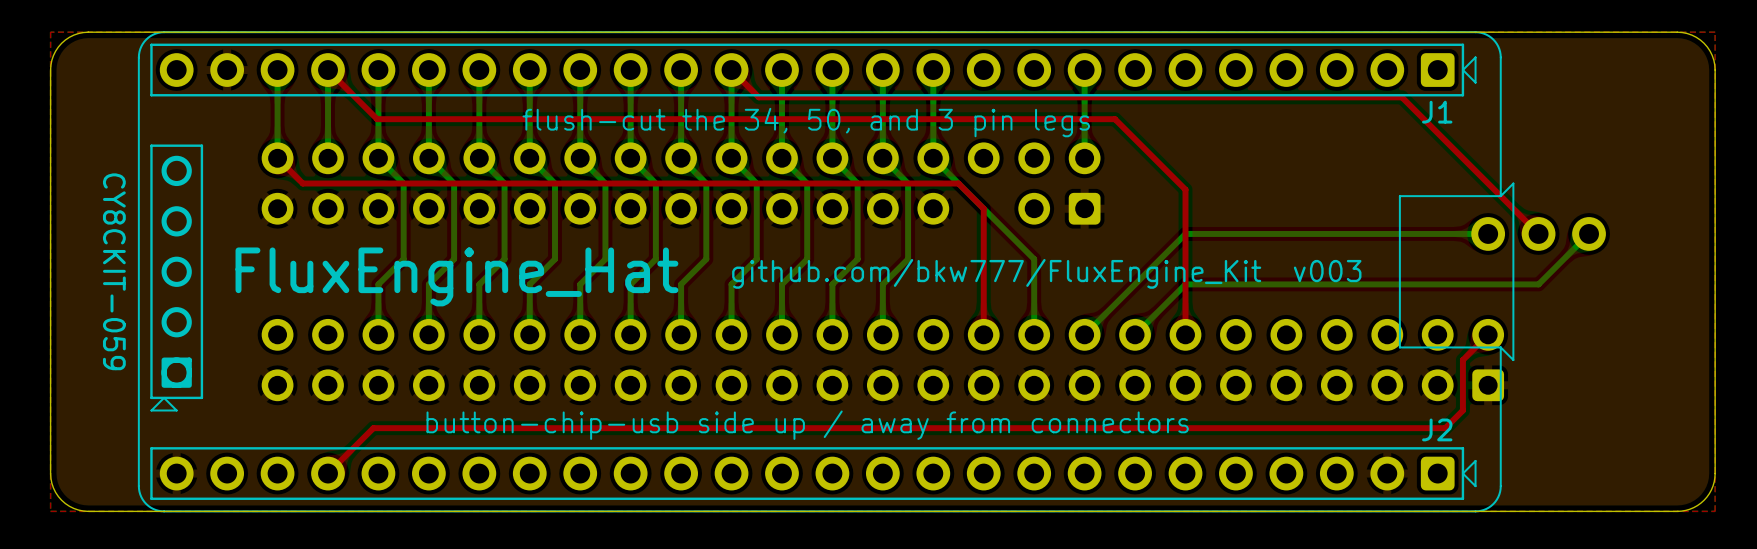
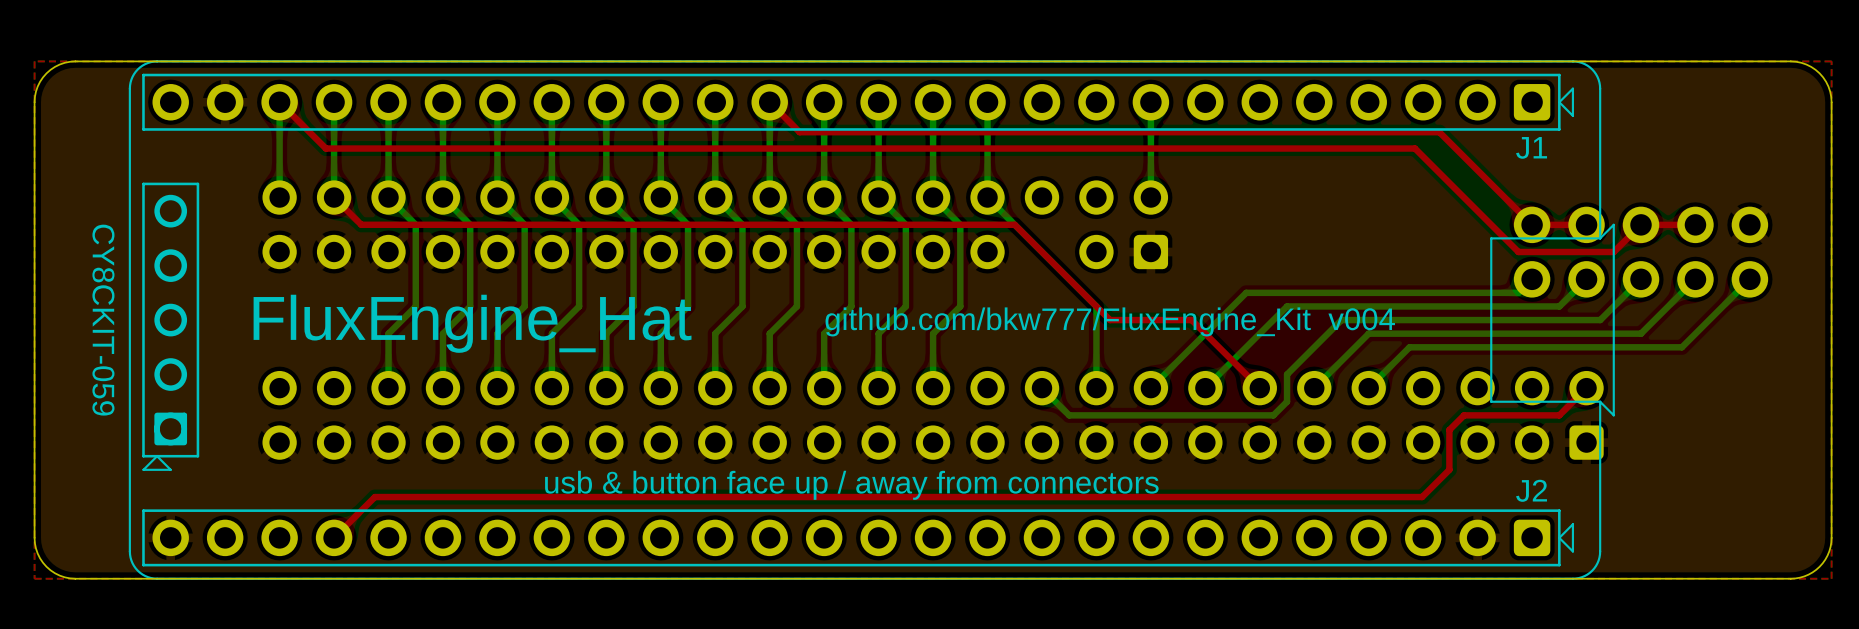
top track: none -> (279, 102) (325, 148) (1415, 148) (1518, 252) (1613, 252) (1641, 224) (1695, 224)
top track: (328, 70) (377, 119) (1115, 119) (1185, 189) (1185, 334) -> none
top track: (758, 97) (1401, 97) (1538, 233) -> (799, 131) (1439, 132) (1532, 224) (1586, 224)
text: flush-cut the 34, 50, and 3 pin legs (806, 122) -> none
top track: (277, 158) (302, 183) (353, 183) -> (334, 197) (361, 224)
top track: (983, 208) (983, 334) -> (1041, 252) (1110, 320) (1191, 320) (1259, 388)
part: none -> (1641, 252)
bottom track: (1488, 233) (1185, 233) (1172, 246) -> (1586, 279) (1559, 306) (1287, 306) (1259, 333)
part: (1538, 233) -> none
bottom track: none -> (1532, 279) (1518, 292) (1246, 292)
bottom track: none -> (1641, 279) (1600, 320) (1341, 320) (1287, 374) (1287, 401) (1273, 415) (1069, 415) (1041, 388)
bottom track: none -> (1749, 279) (1681, 347) (1409, 347) (1368, 388)
text: github.com/bkw777/FluxEngine_Kit v003 (1046, 273) -> github.com/bkw777/FluxEngine_Kit v004 (1110, 321)
bottom track: (1185, 284) (1286, 284) -> (1314, 388) (1368, 333)
top track: (1462, 360) (1462, 410) (1445, 428) (373, 428) (365, 435) -> (1559, 415) (1464, 415) (1449, 430) (1449, 469) (1422, 497) (374, 497)
text: button-chip-usb side up / away from connectors (807, 425) -> usb & button face up / away from connectors (851, 485)

